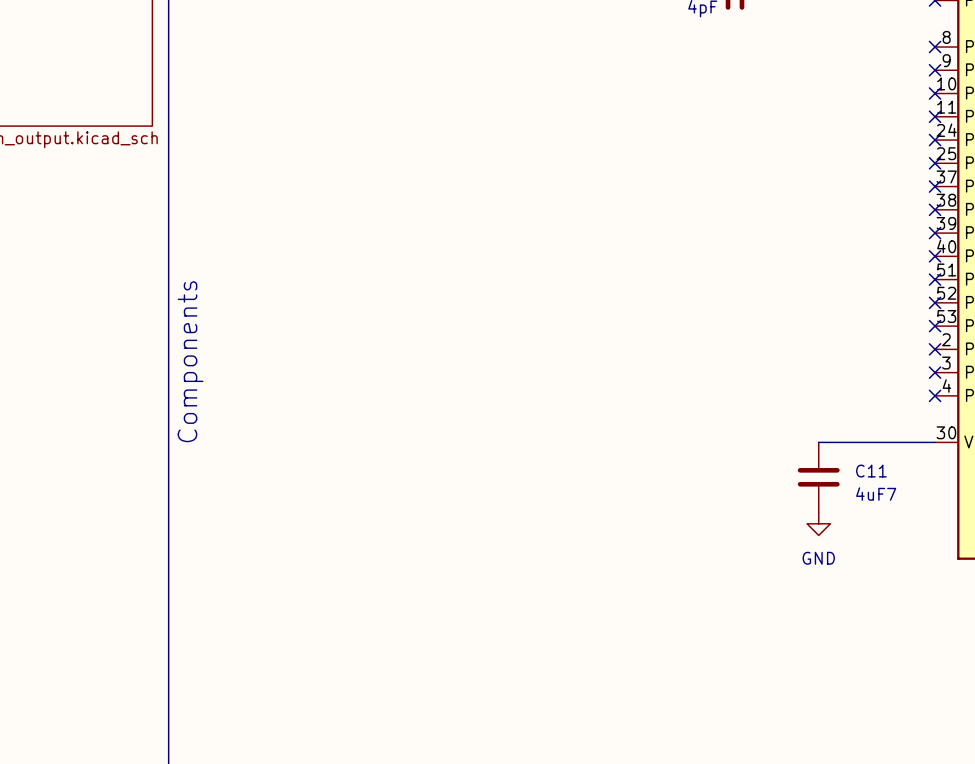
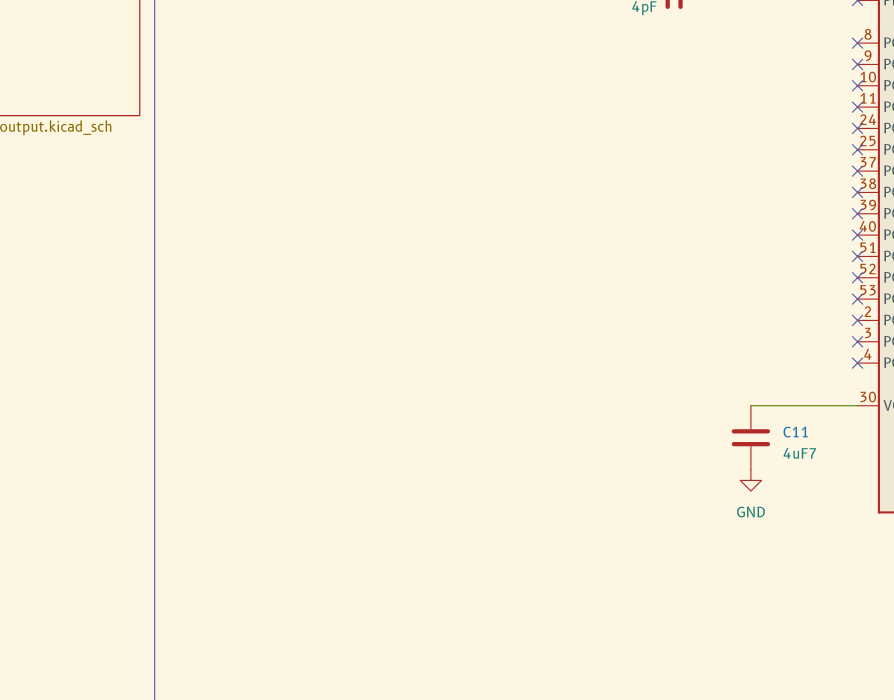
text: Components (190, 361) -> none

